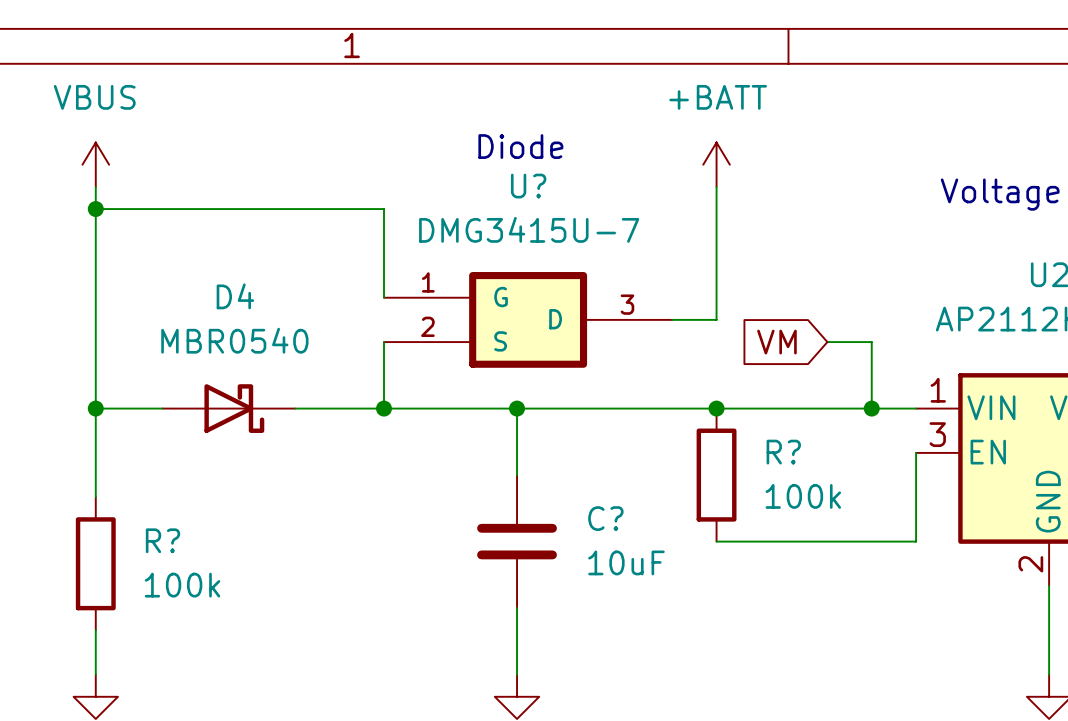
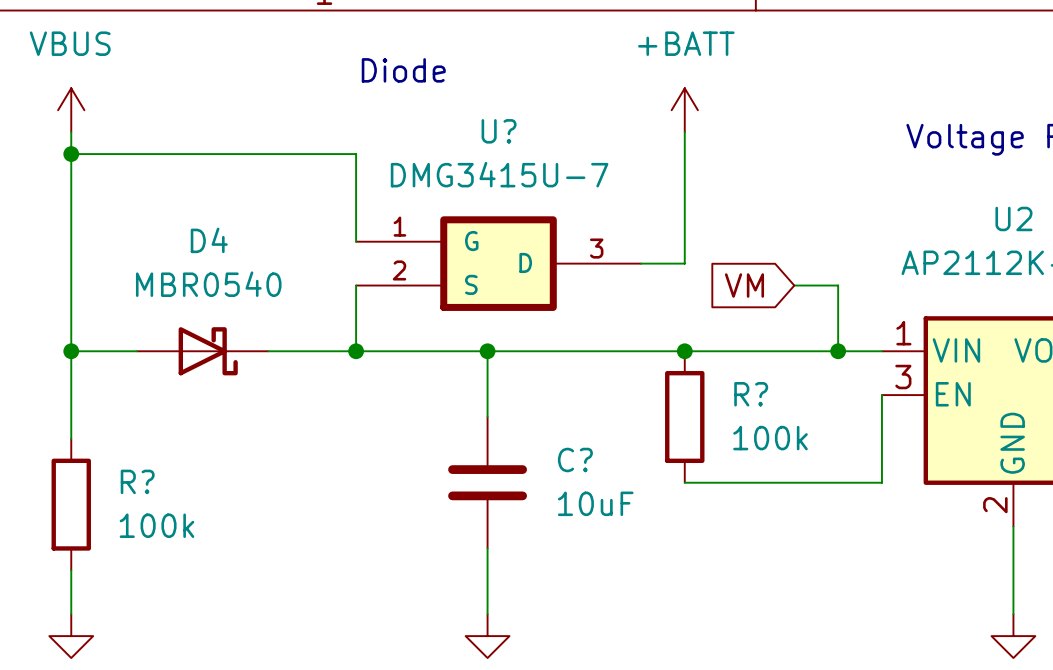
text position: Diode (520, 146) -> Diode (403, 70)

